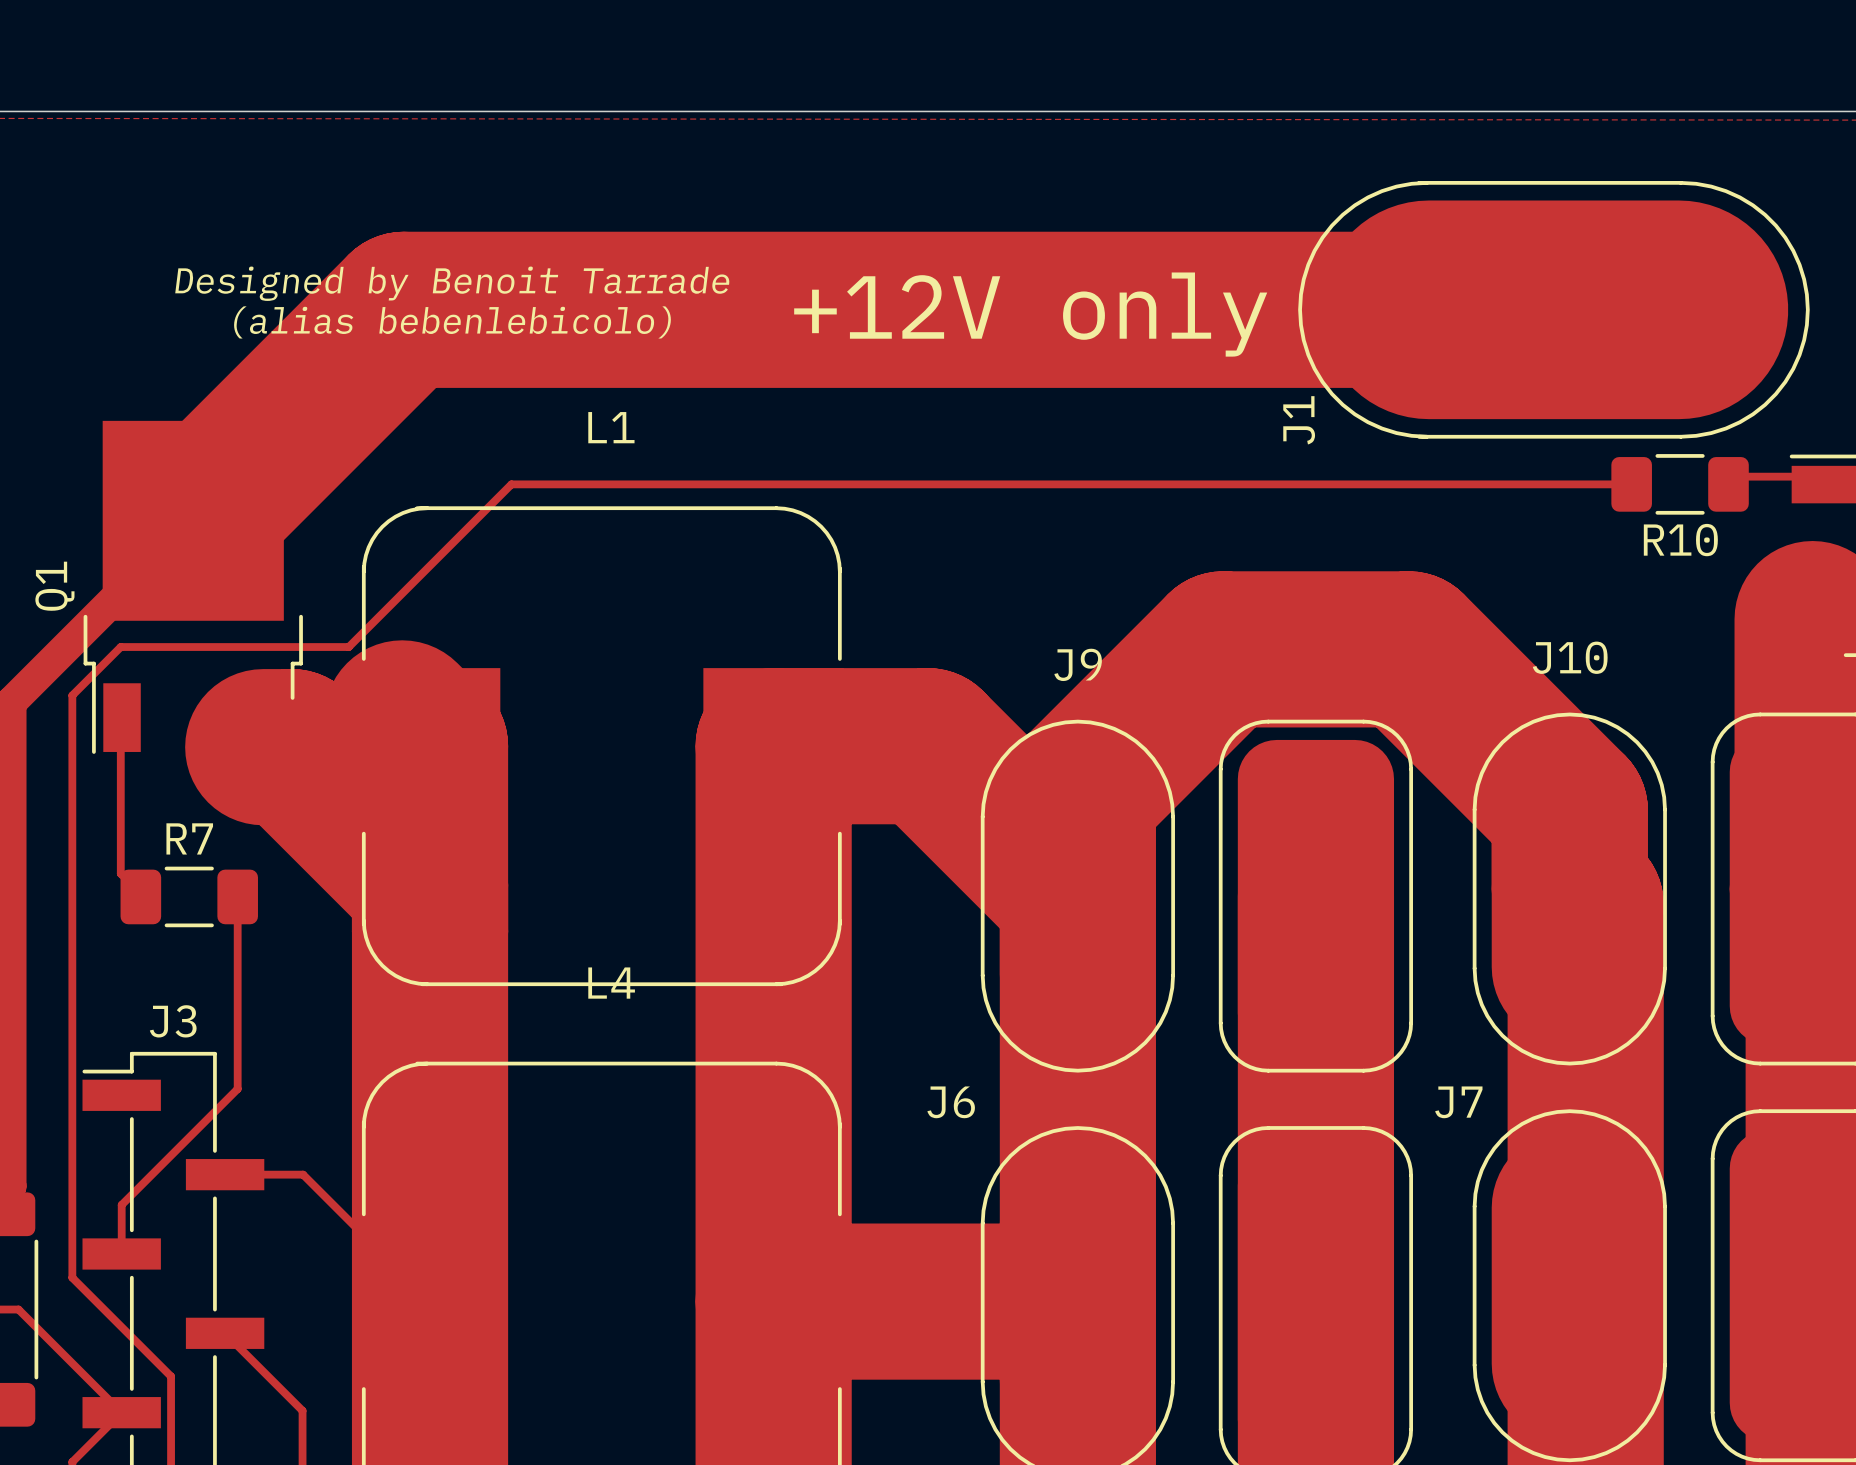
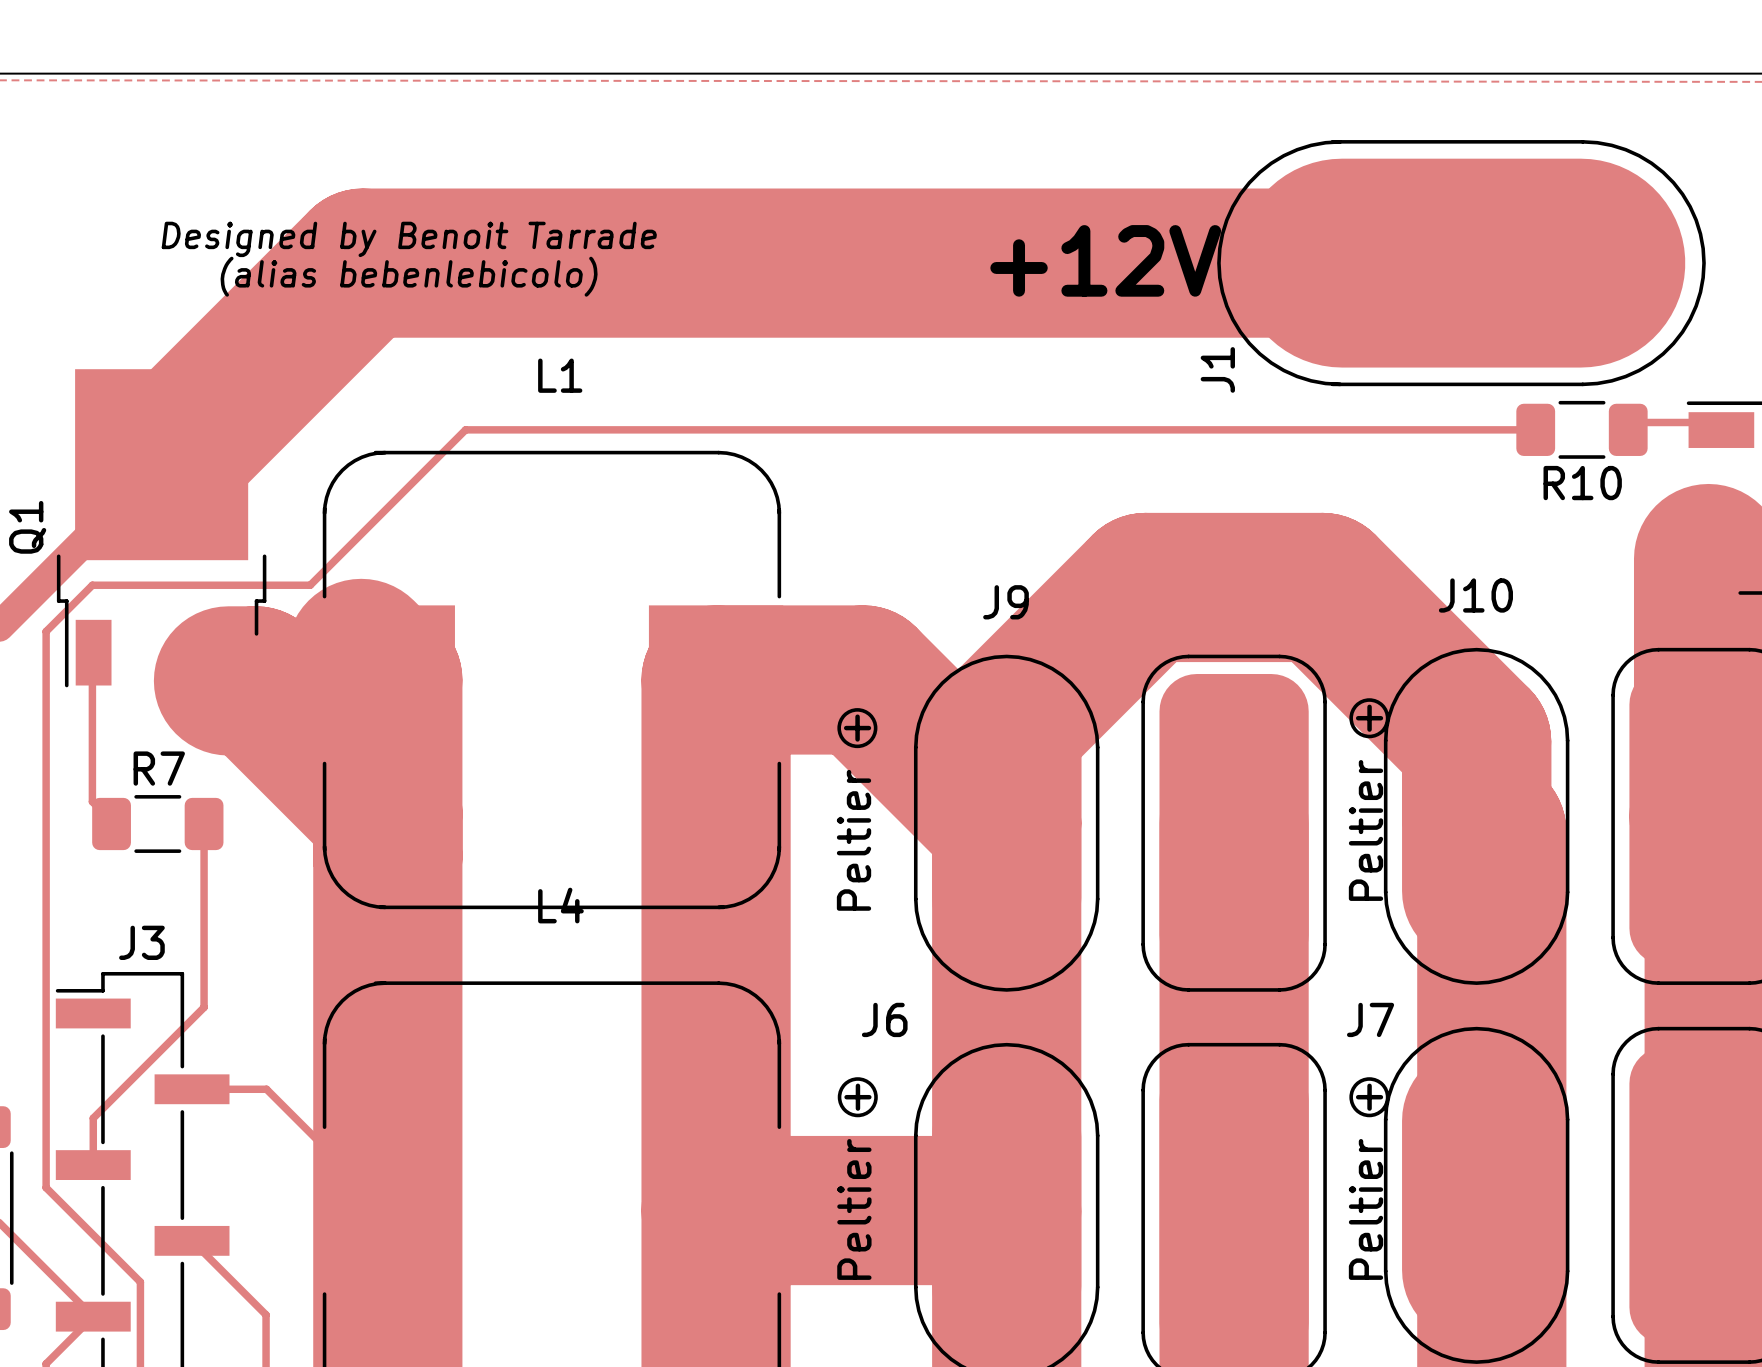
text: +12V only (1030, 314) -> +12V (1105, 260)
drawing: none -> [1349, 698, 1390, 739]
drawing: none -> [837, 708, 878, 749]
text: none -> Peltier + (1366, 802)
text: none -> Peltier + (854, 812)
drawing: none -> [837, 1077, 878, 1118]
drawing: none -> [1349, 1077, 1390, 1118]
text: none -> Peltier + (854, 1181)
text: none -> Peltier + (1366, 1181)

